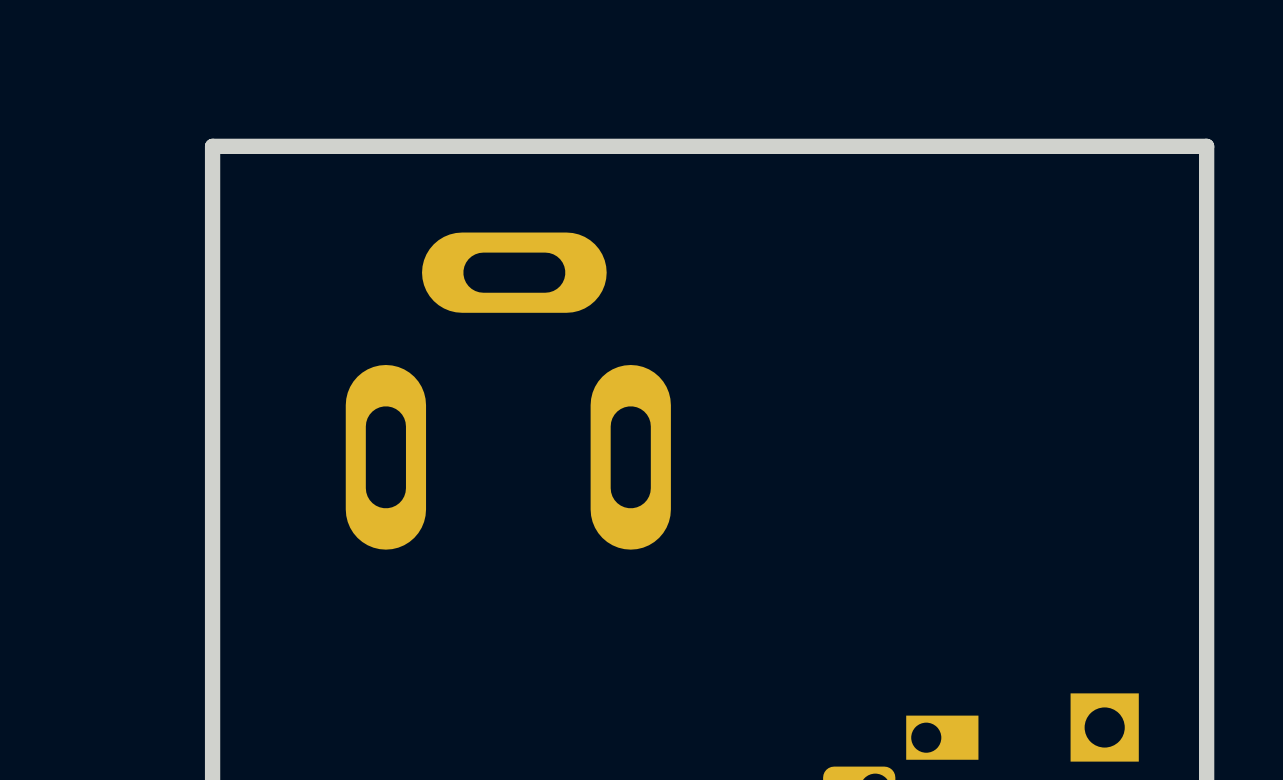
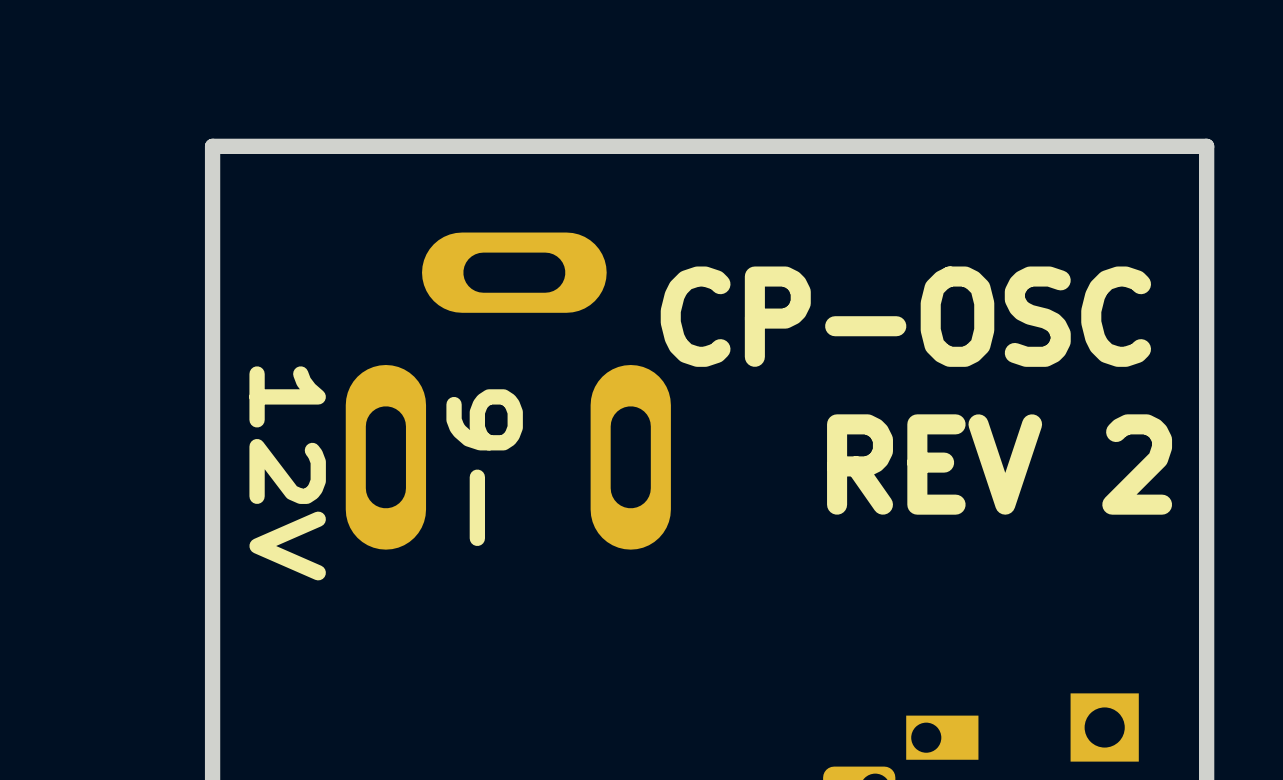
text: none -> CP-OSC (905, 316)
text: none -> REV 2 (999, 464)
text: none -> 9- (484, 467)
text: none -> 12V (287, 473)

